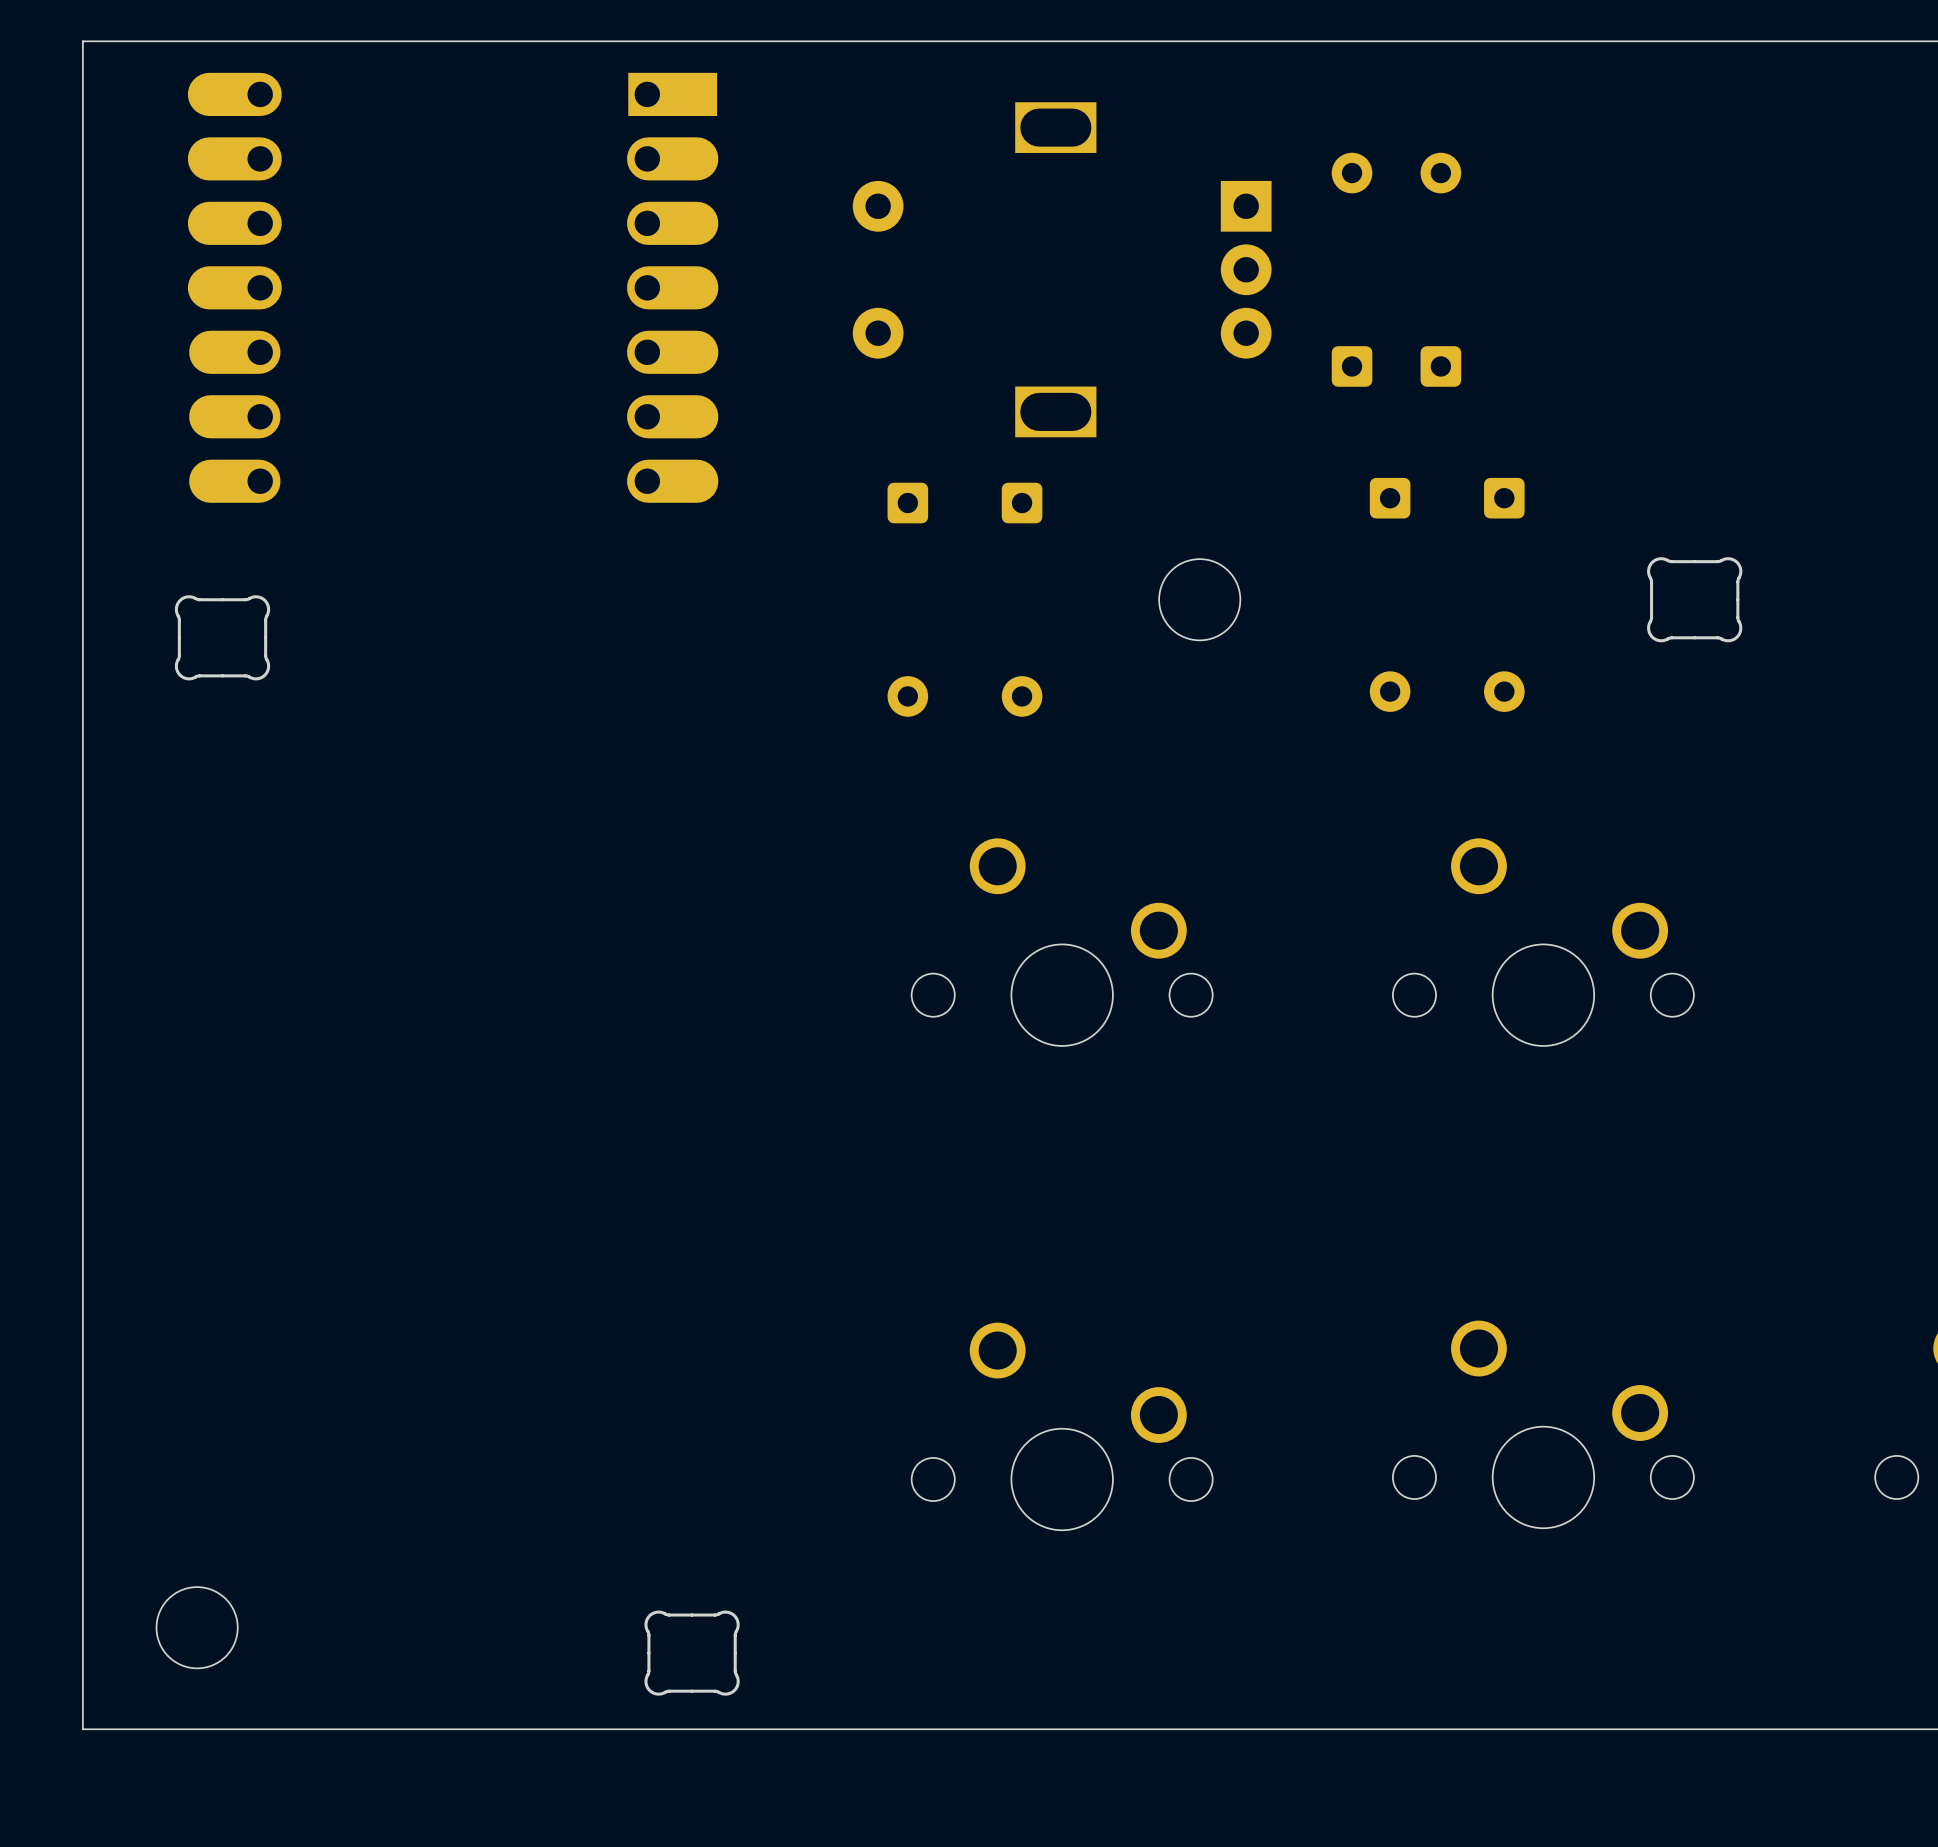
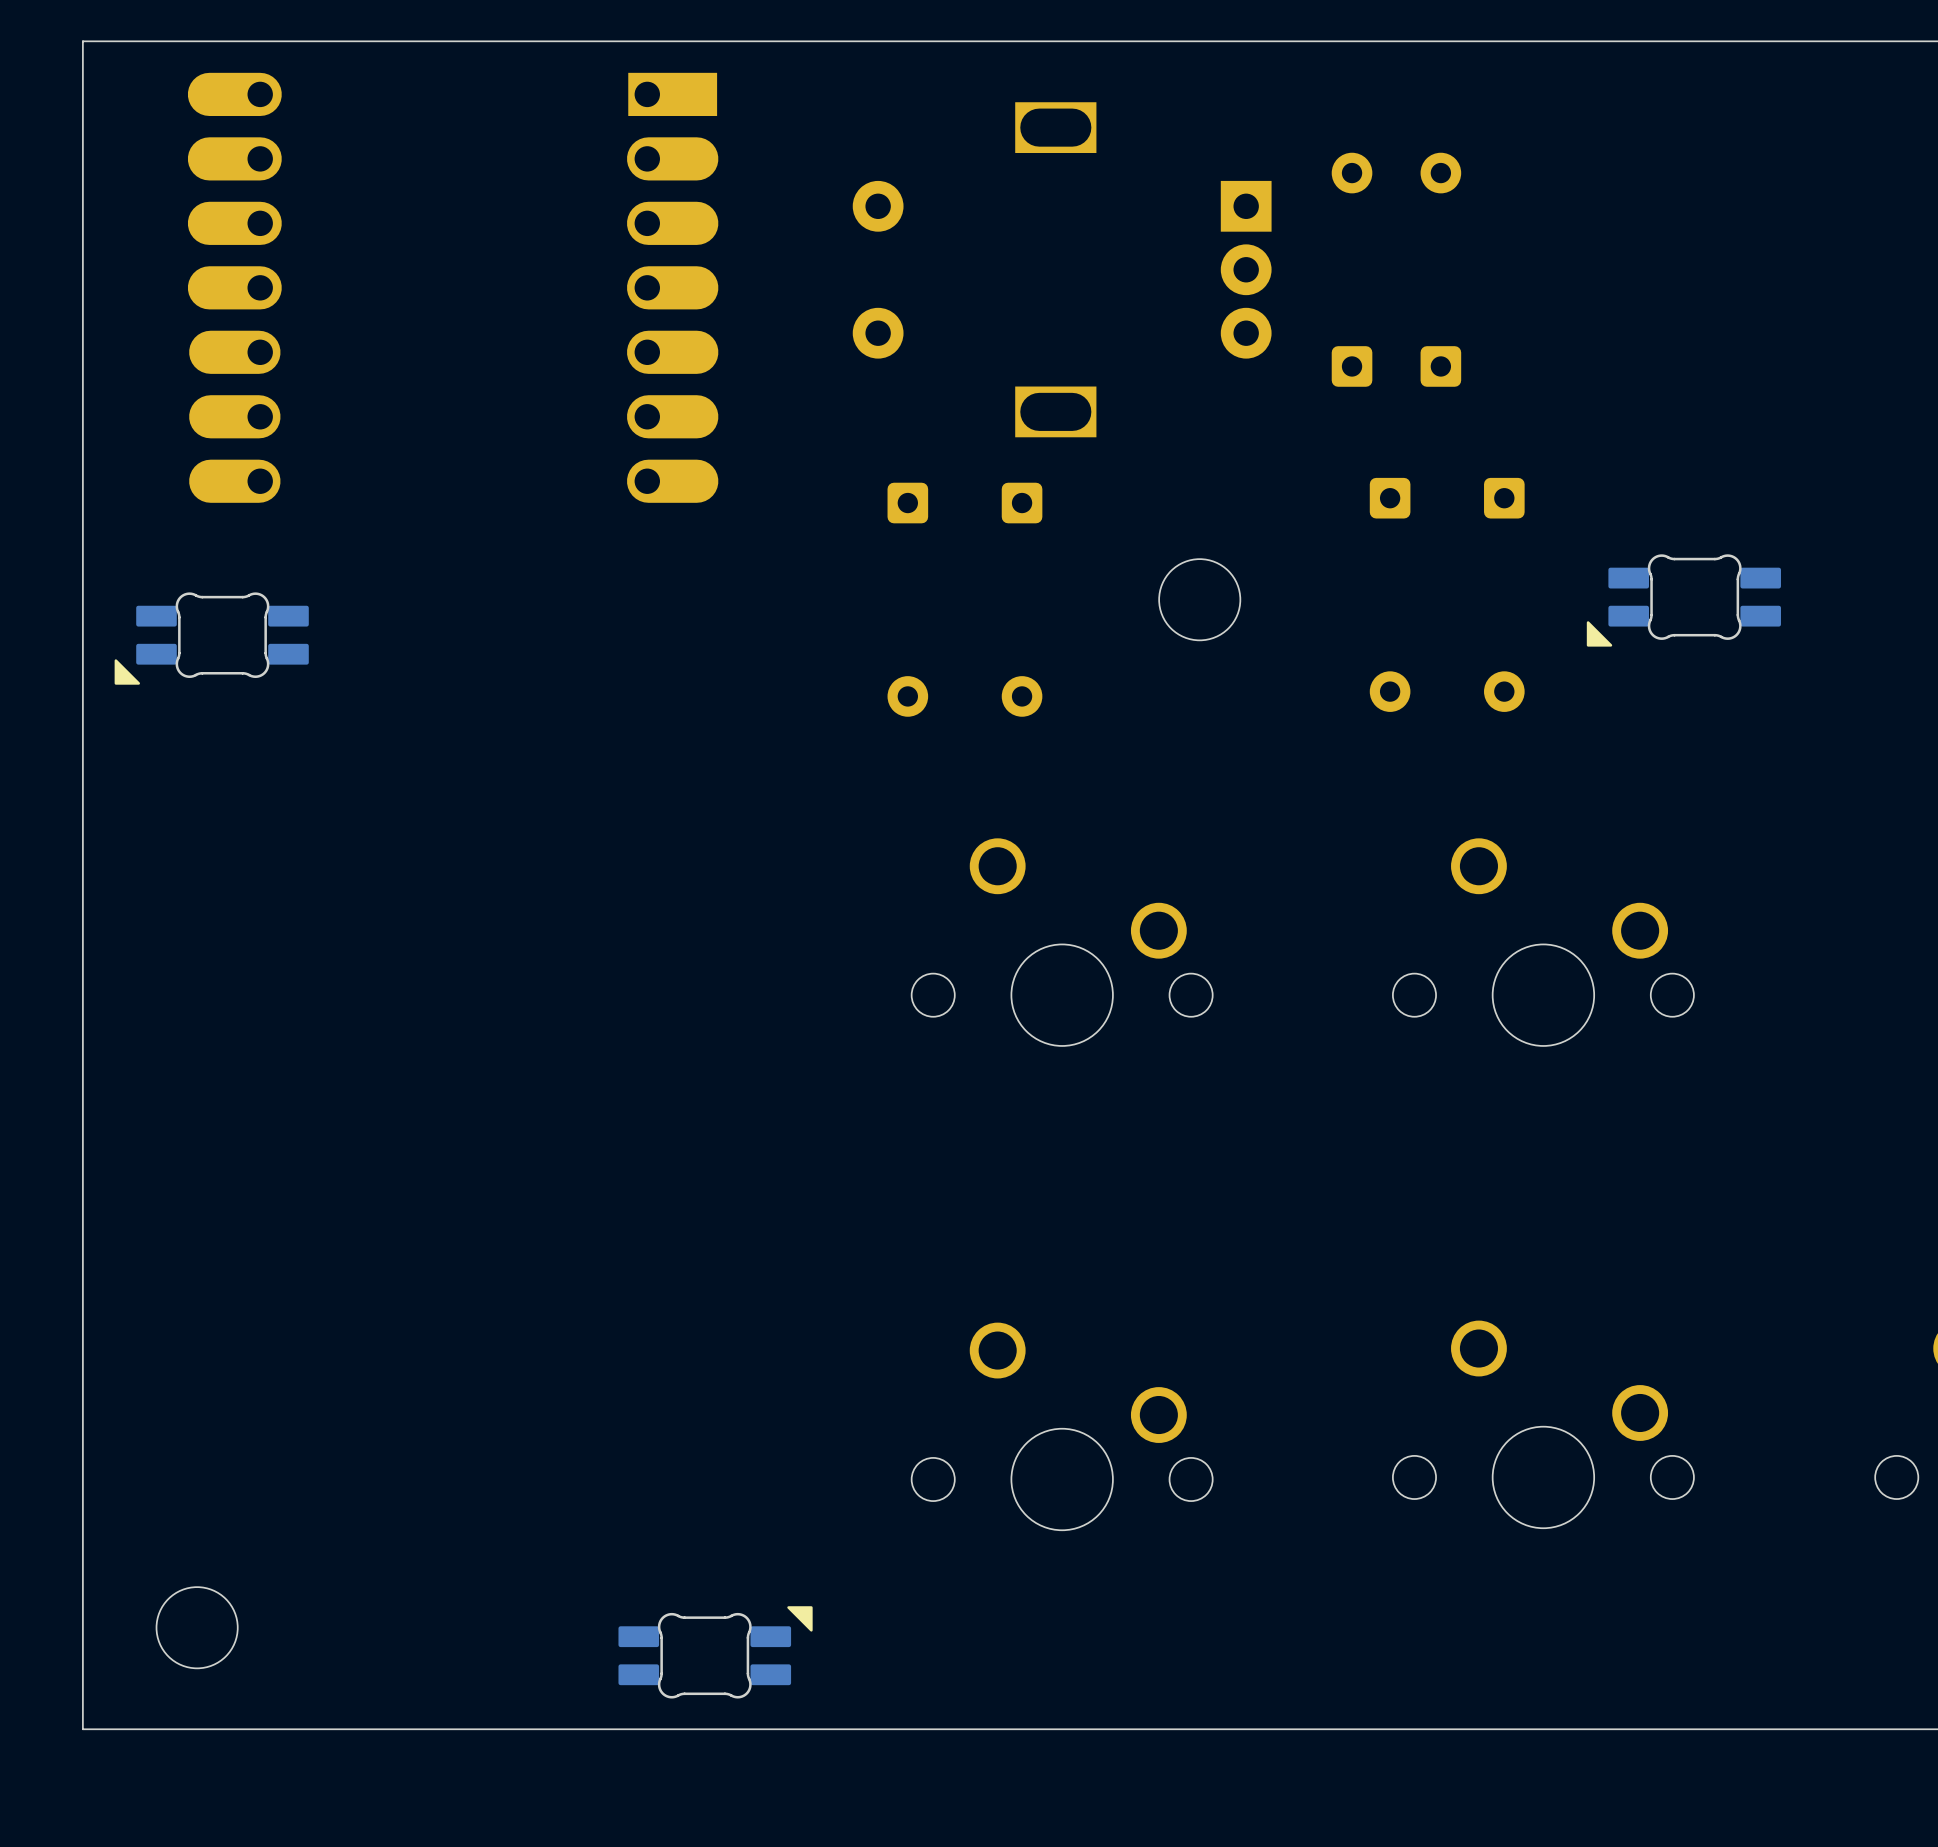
part footprint: [1647, 557, 1743, 643] -> [1586, 554, 1781, 647]
part footprint: [174, 595, 271, 681] -> [114, 592, 309, 685]
part footprint: [644, 1610, 740, 1696] -> [618, 1606, 813, 1699]

